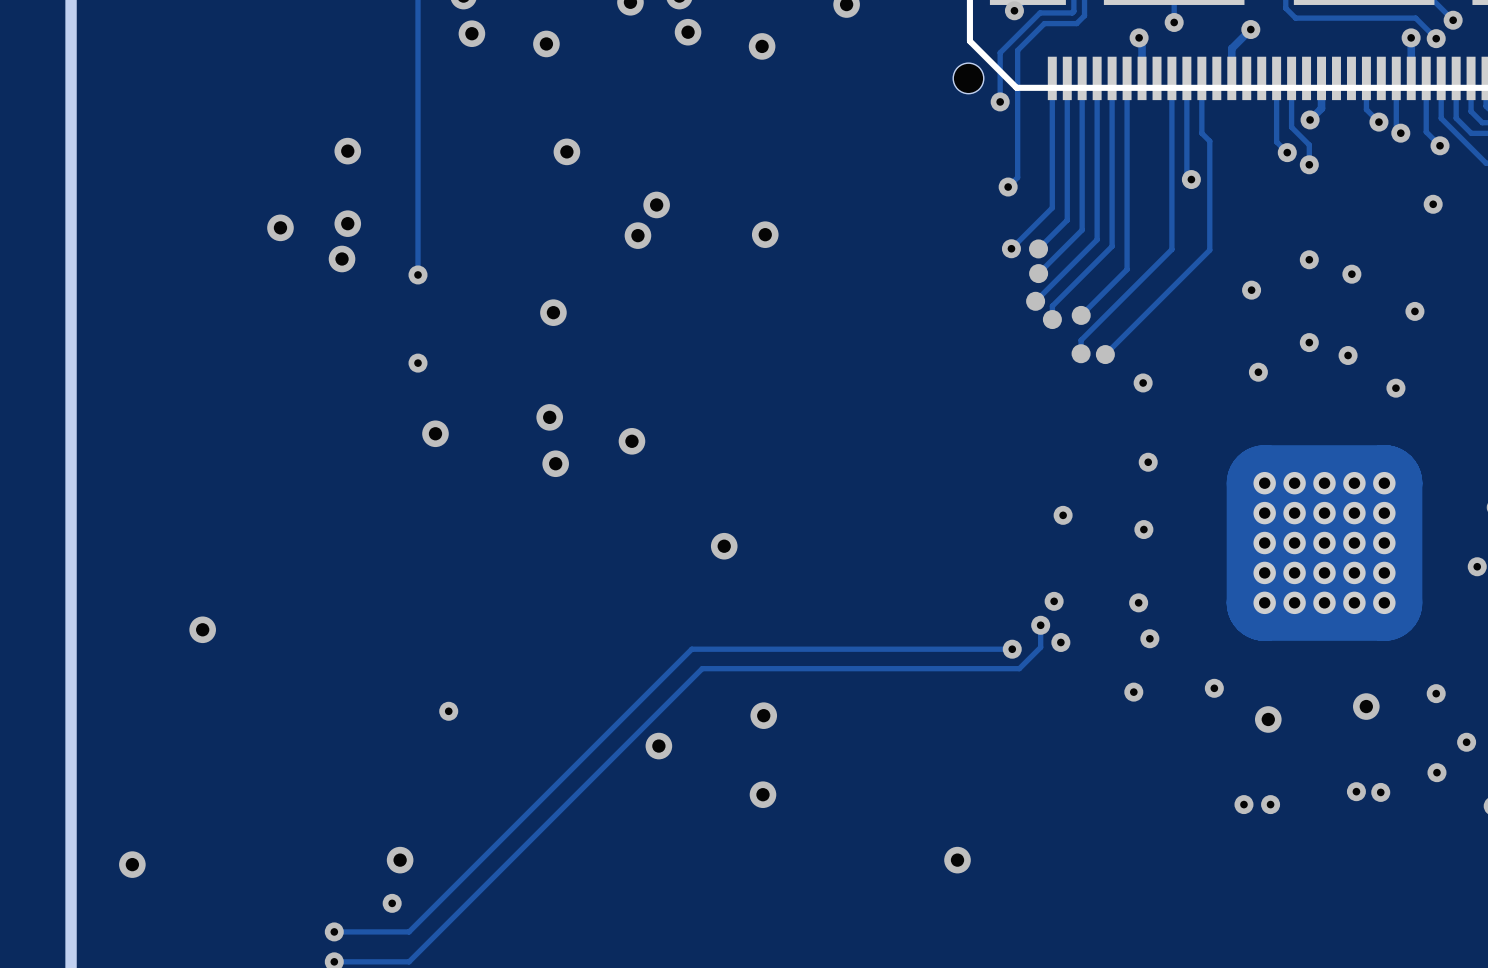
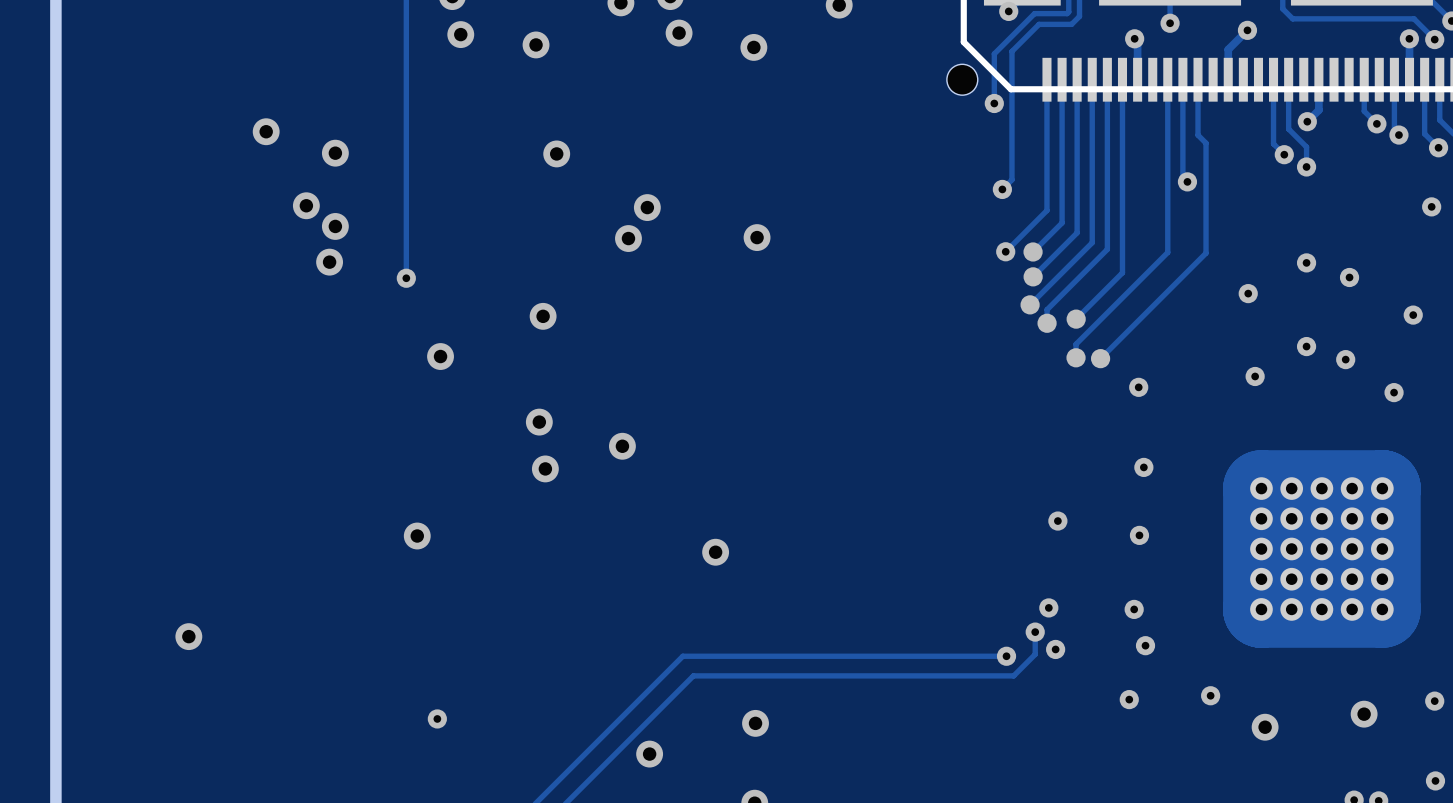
via: none -> (266, 131)
via position: (280, 227) -> (306, 205)
via: none -> (440, 356)
via: (418, 363) -> none
via: (435, 433) -> none
via: none -> (417, 536)

